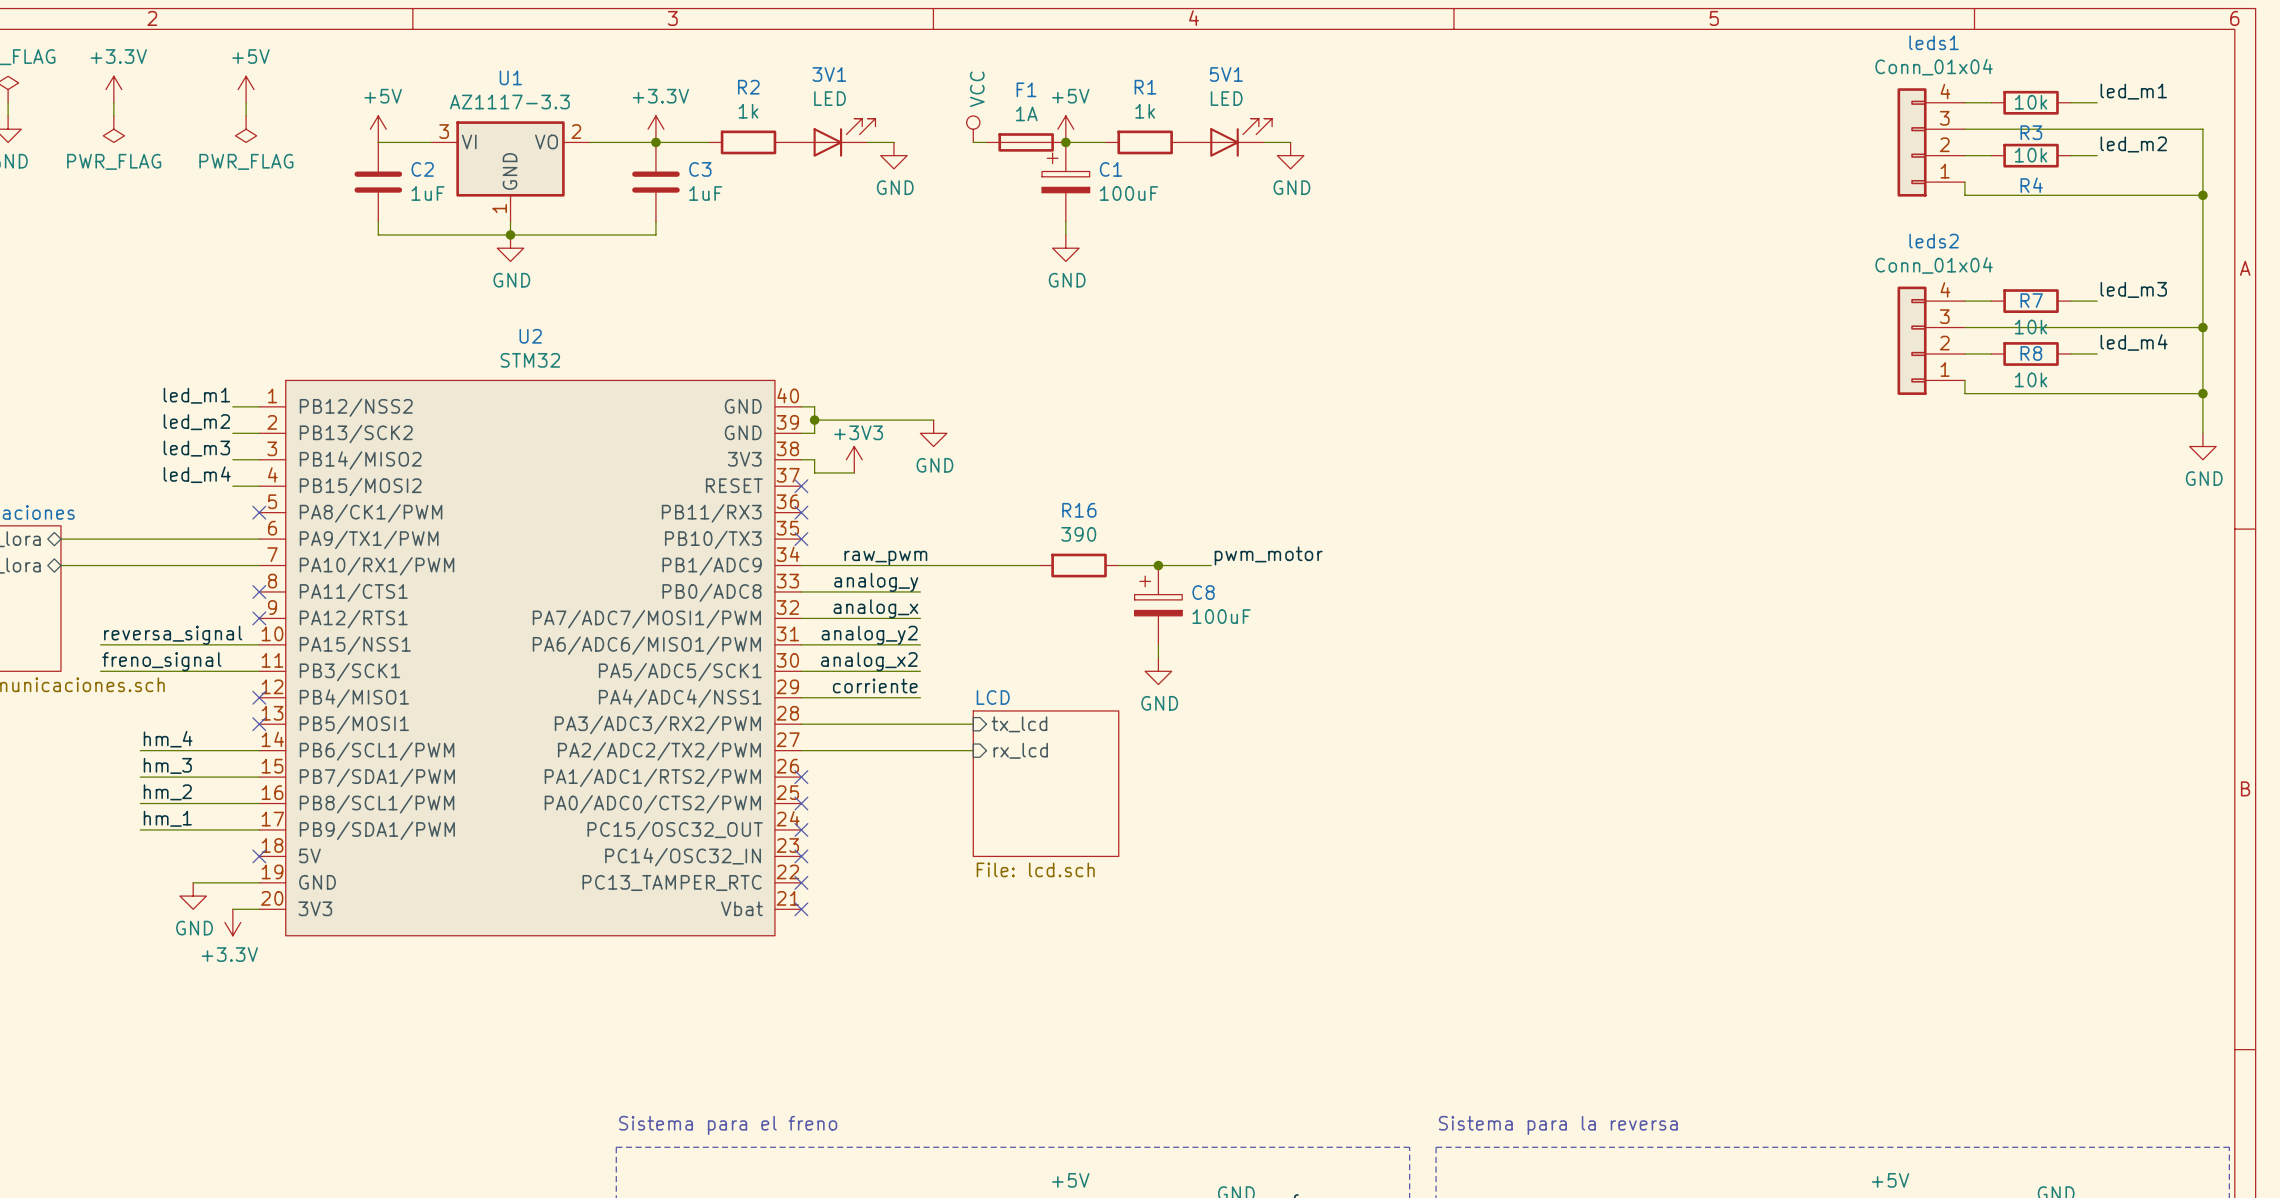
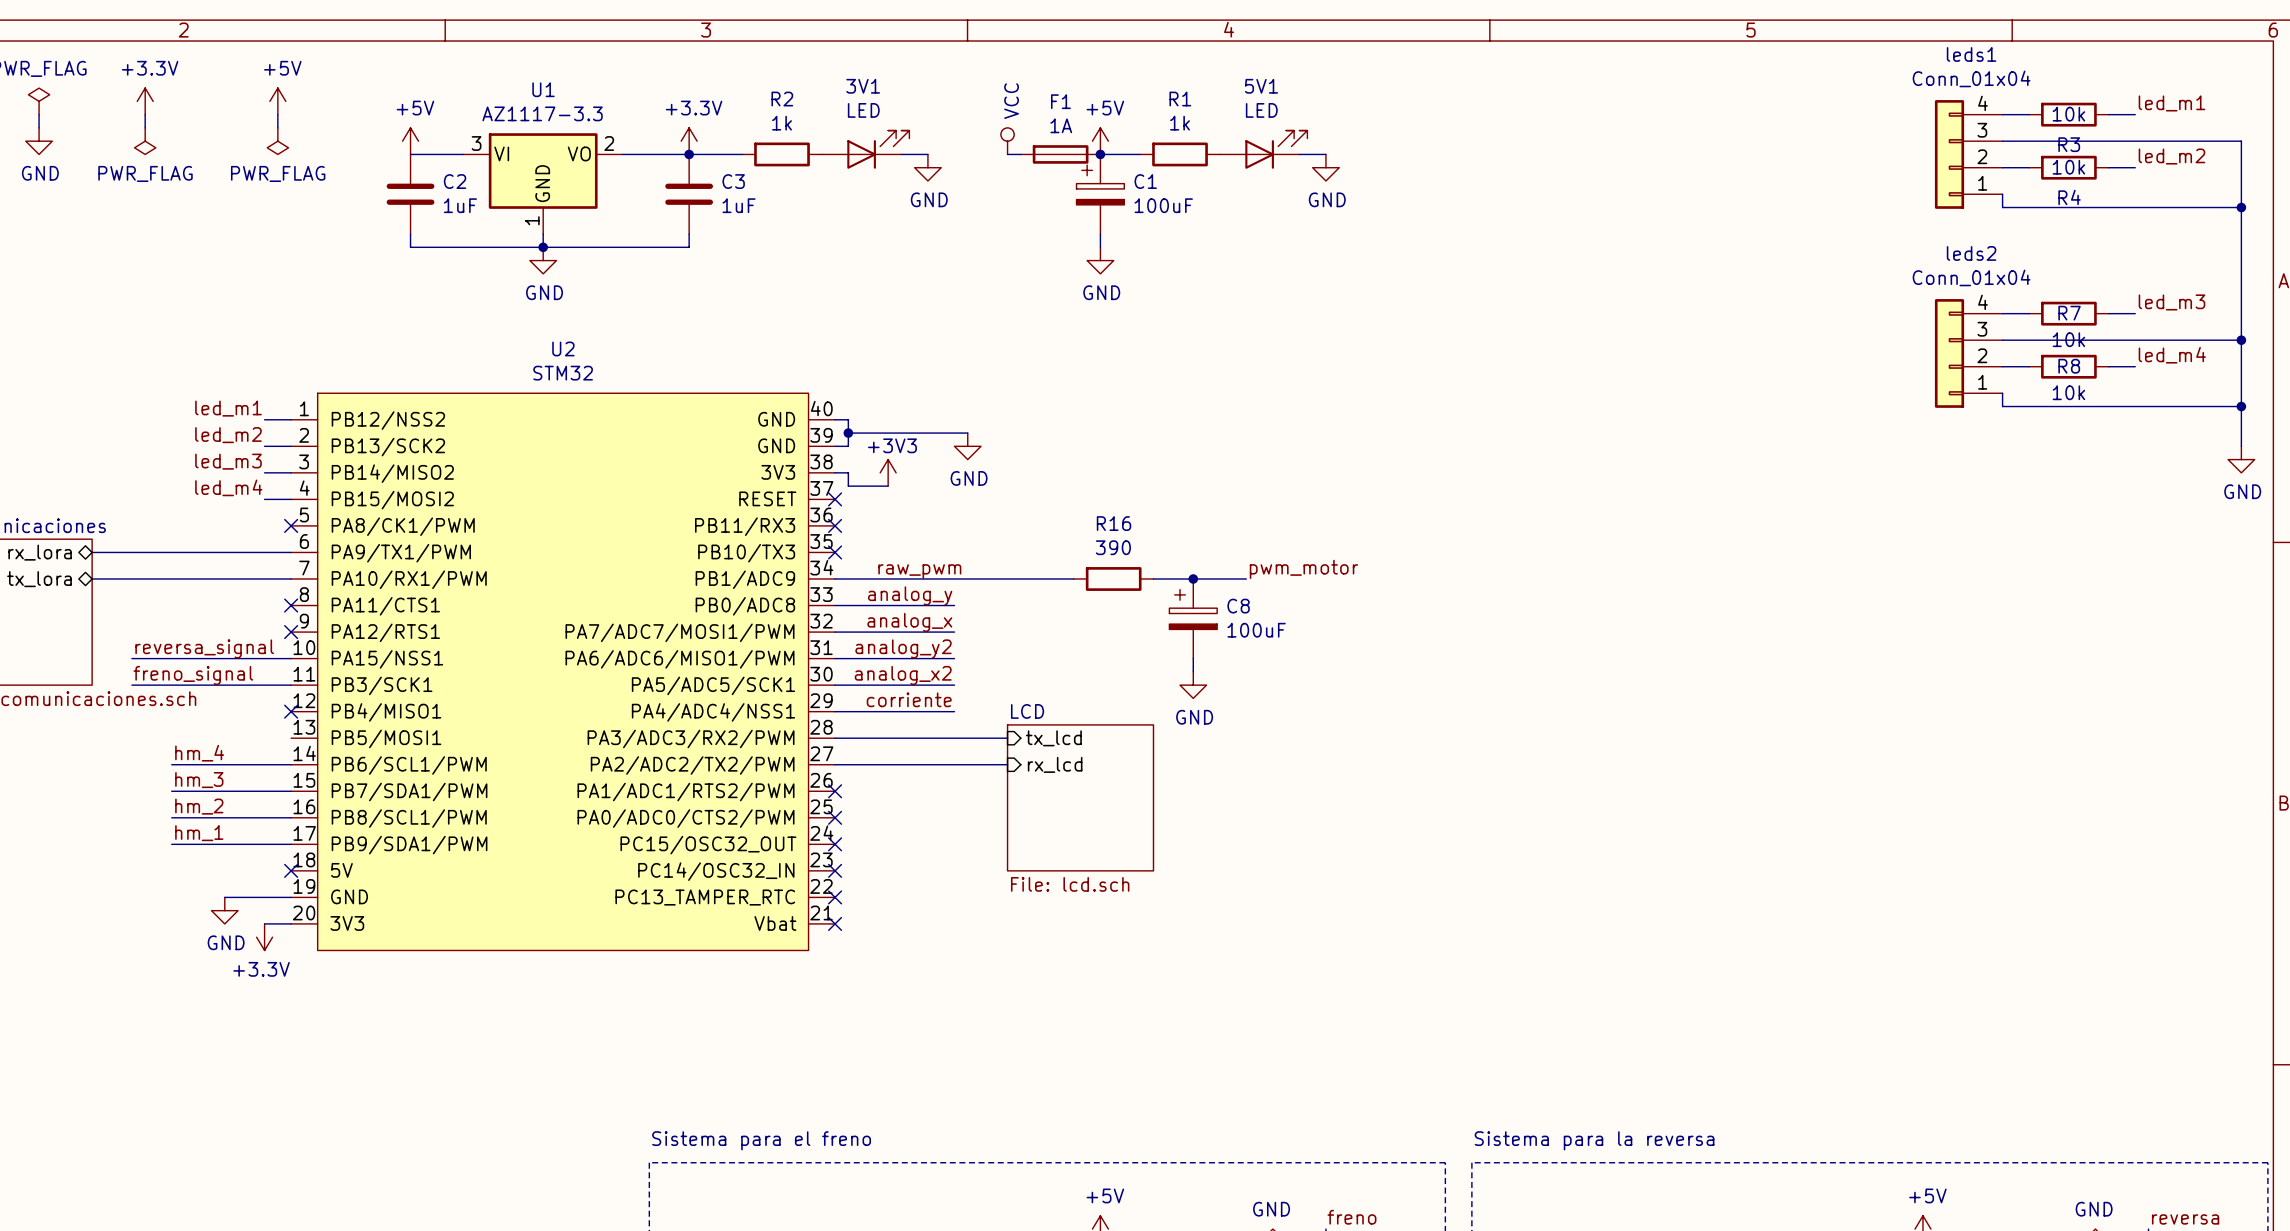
no-connect mark: (259, 724) -> none

